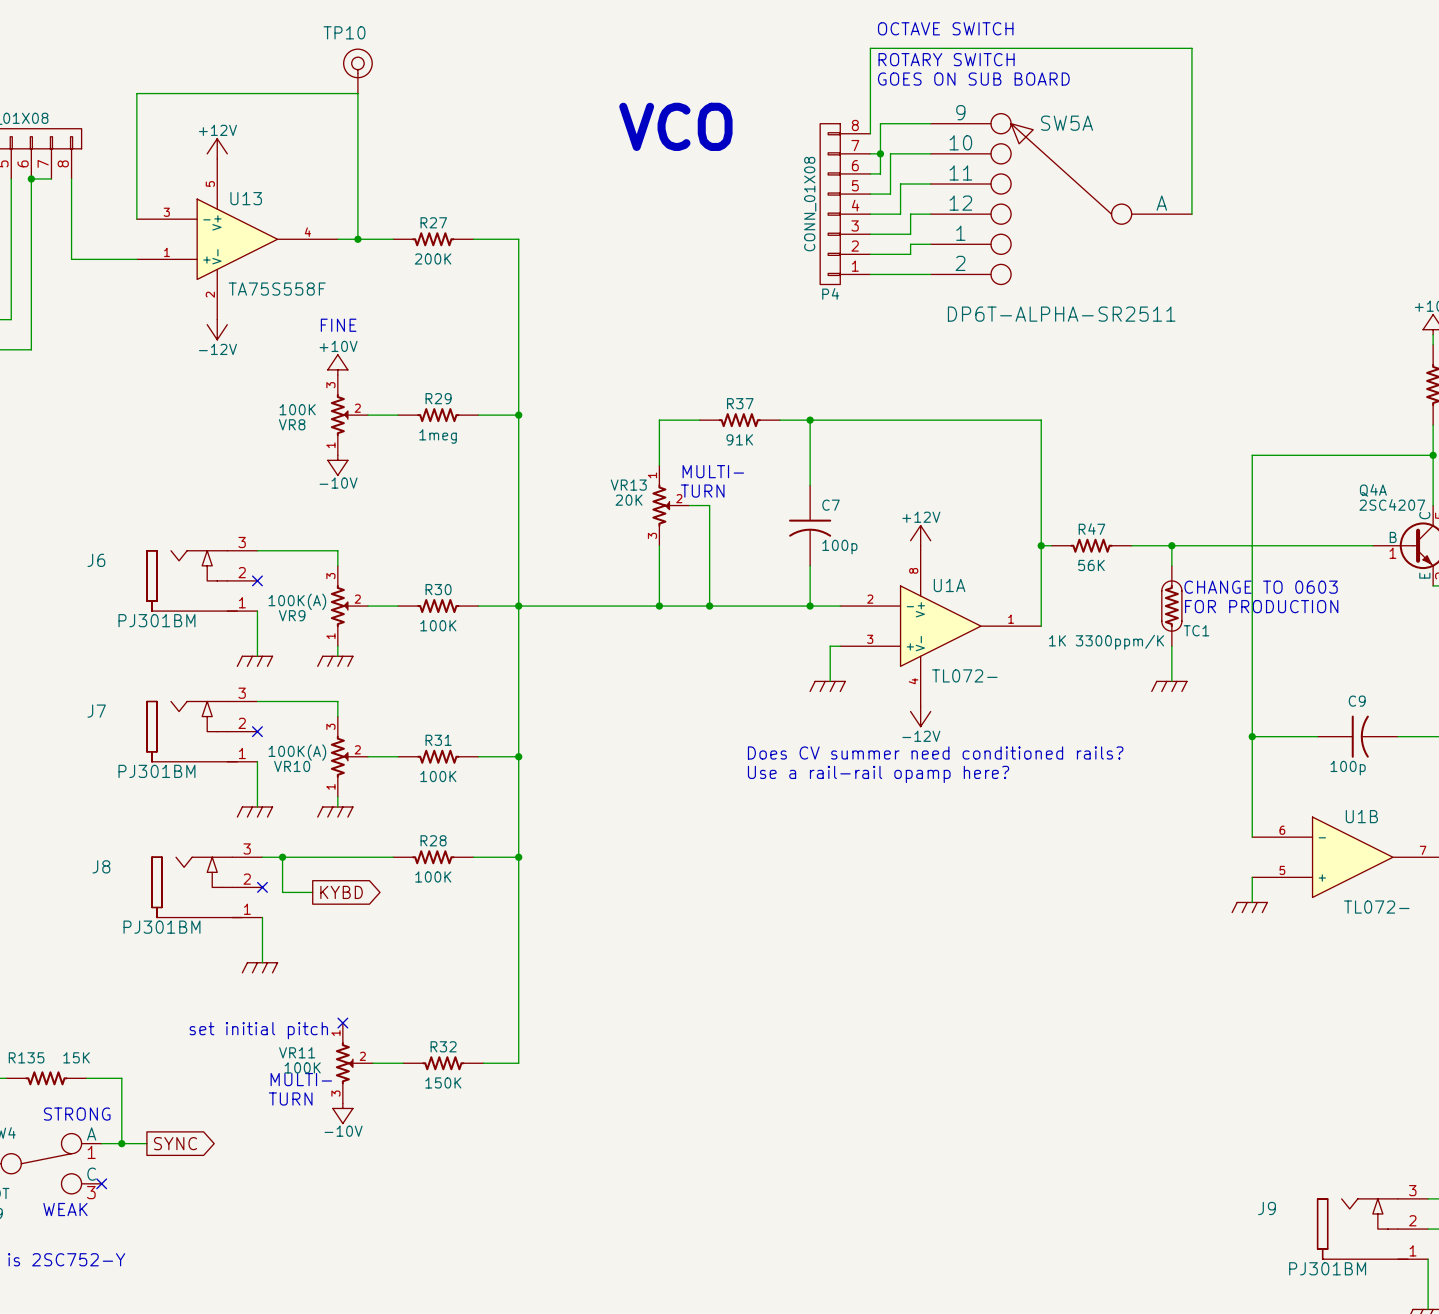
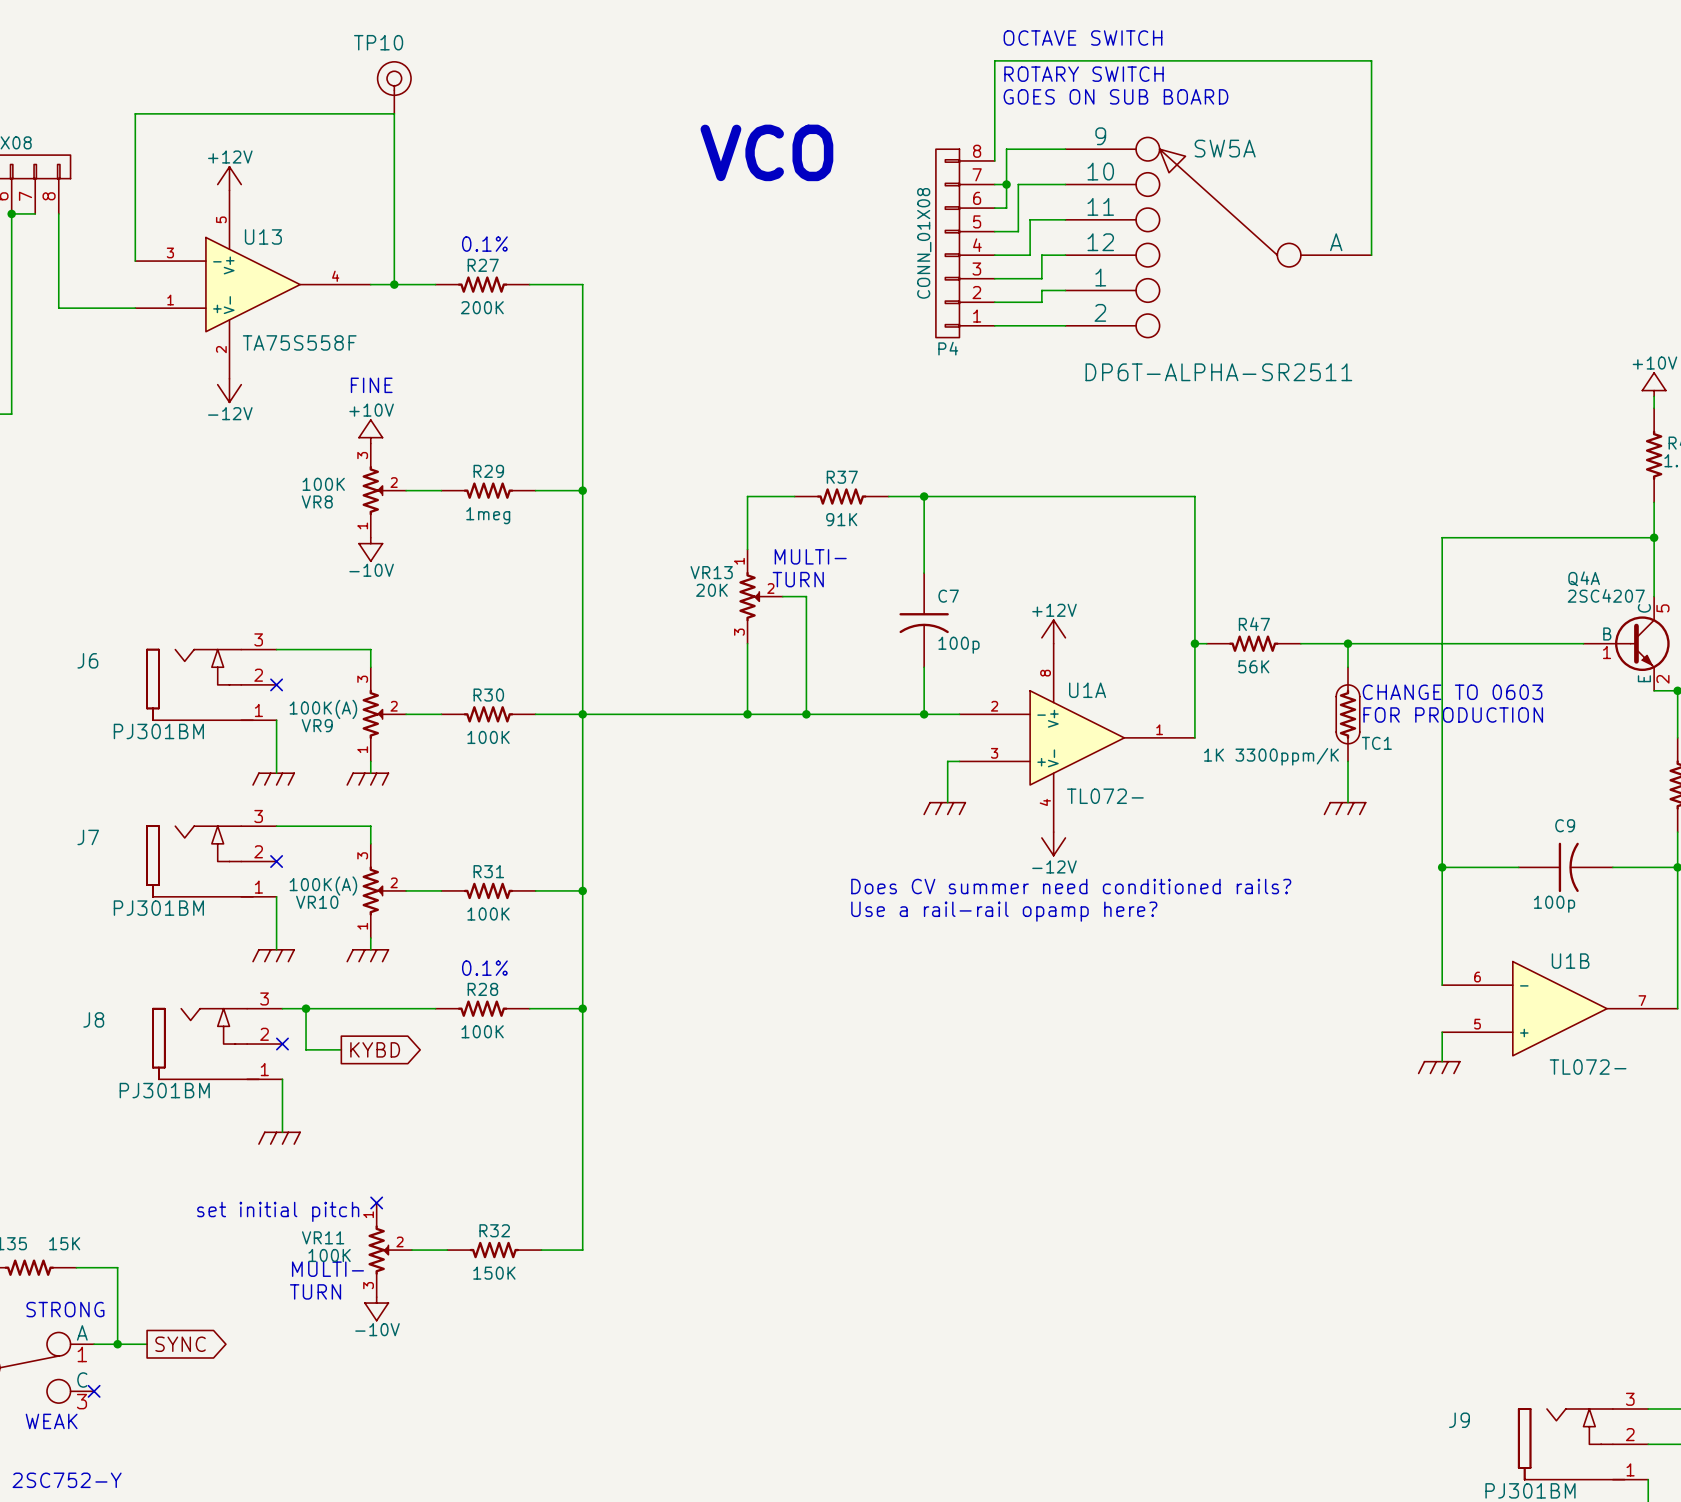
text: none -> 0.1% (484, 244)
text: none -> 0.1% (484, 968)

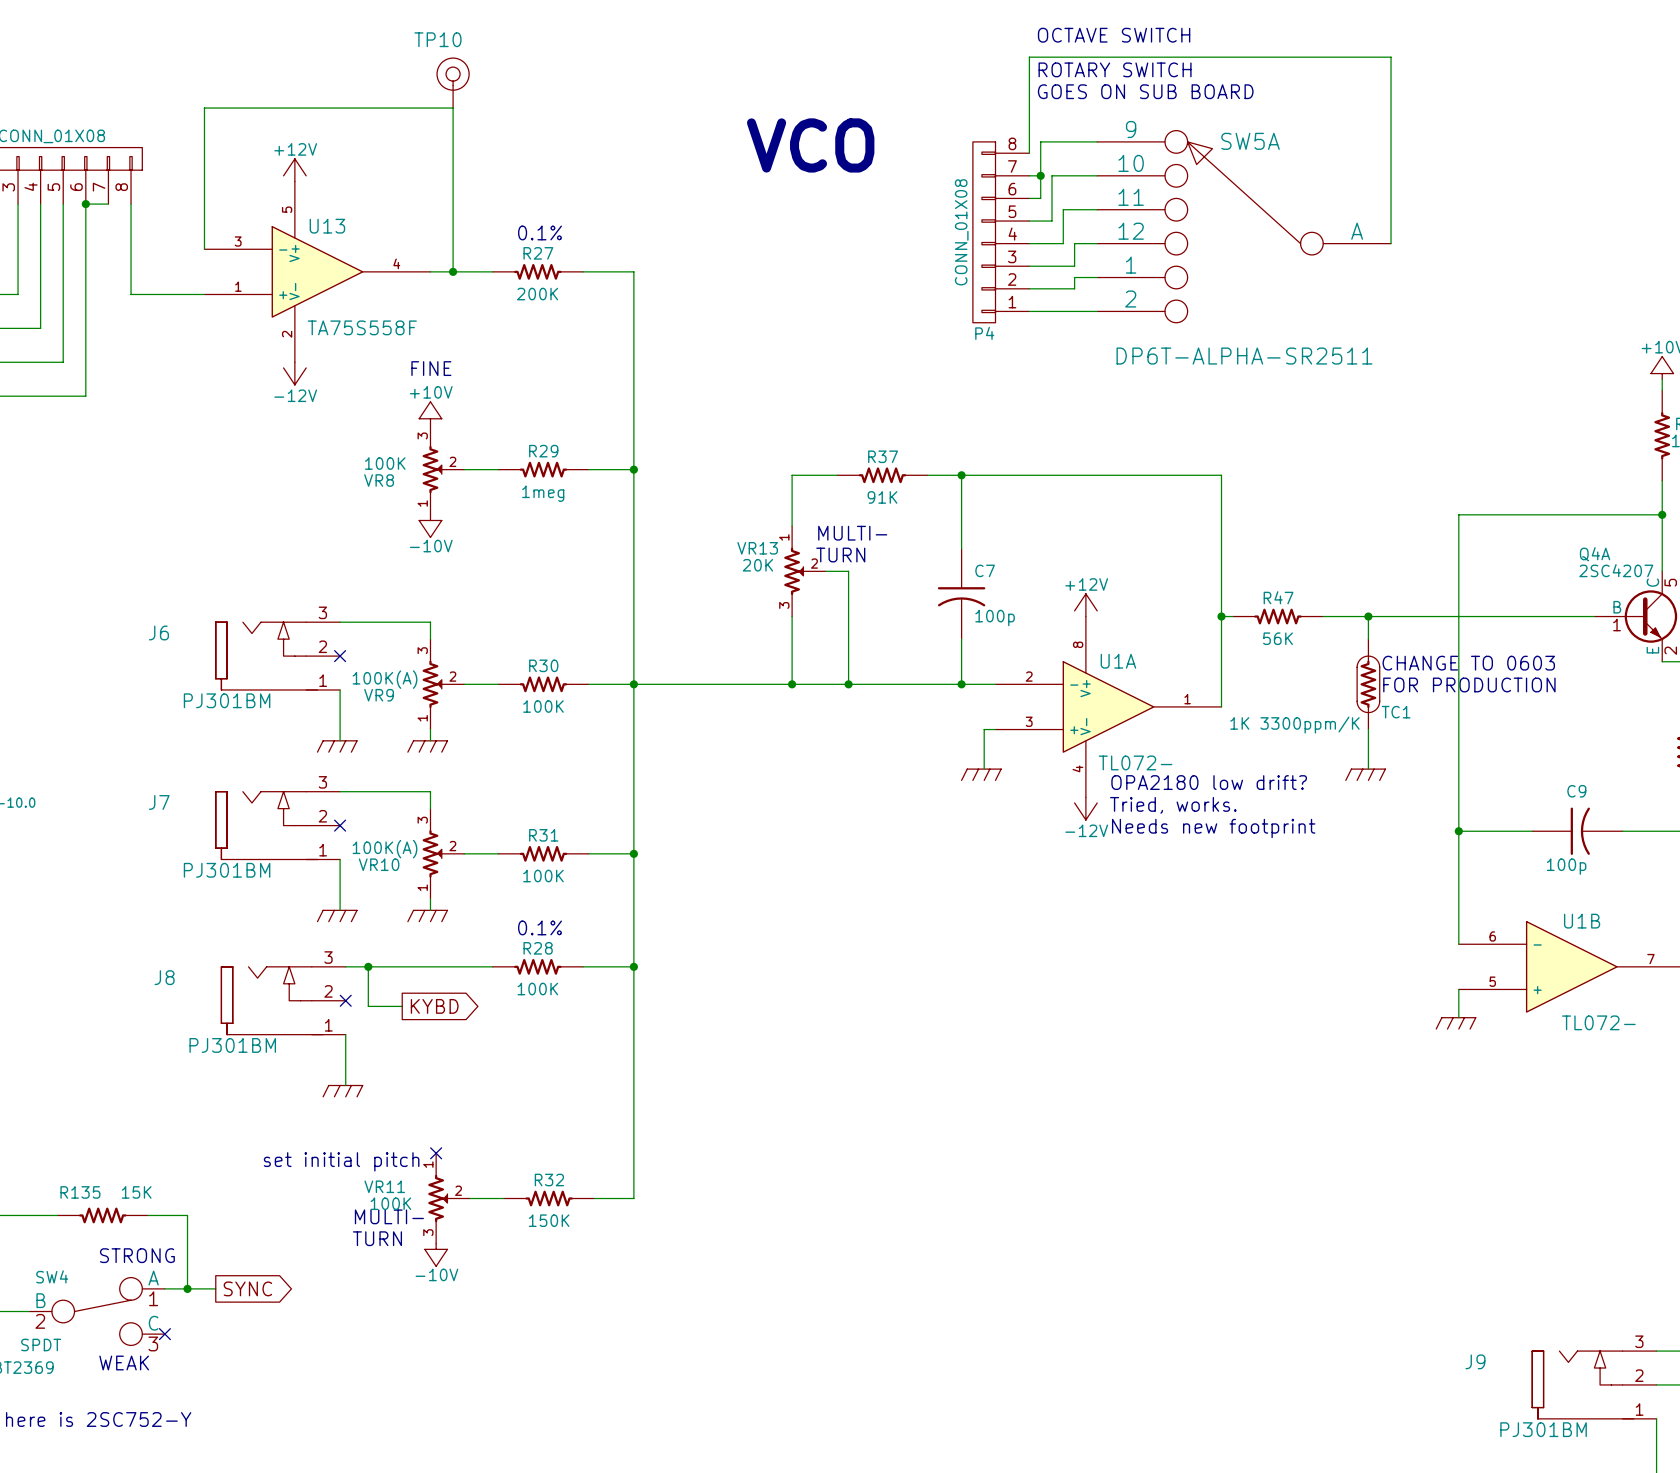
text: none -> OPA2180 low drift? (1209, 782)
text: none -> Tried, works. (1173, 805)
text: none -> Needs new footprint (1213, 828)
text: Does CV summer need conditioned rails? (1071, 886) -> none
text: Use a rail-rail opamp here? (1004, 911) -> none

